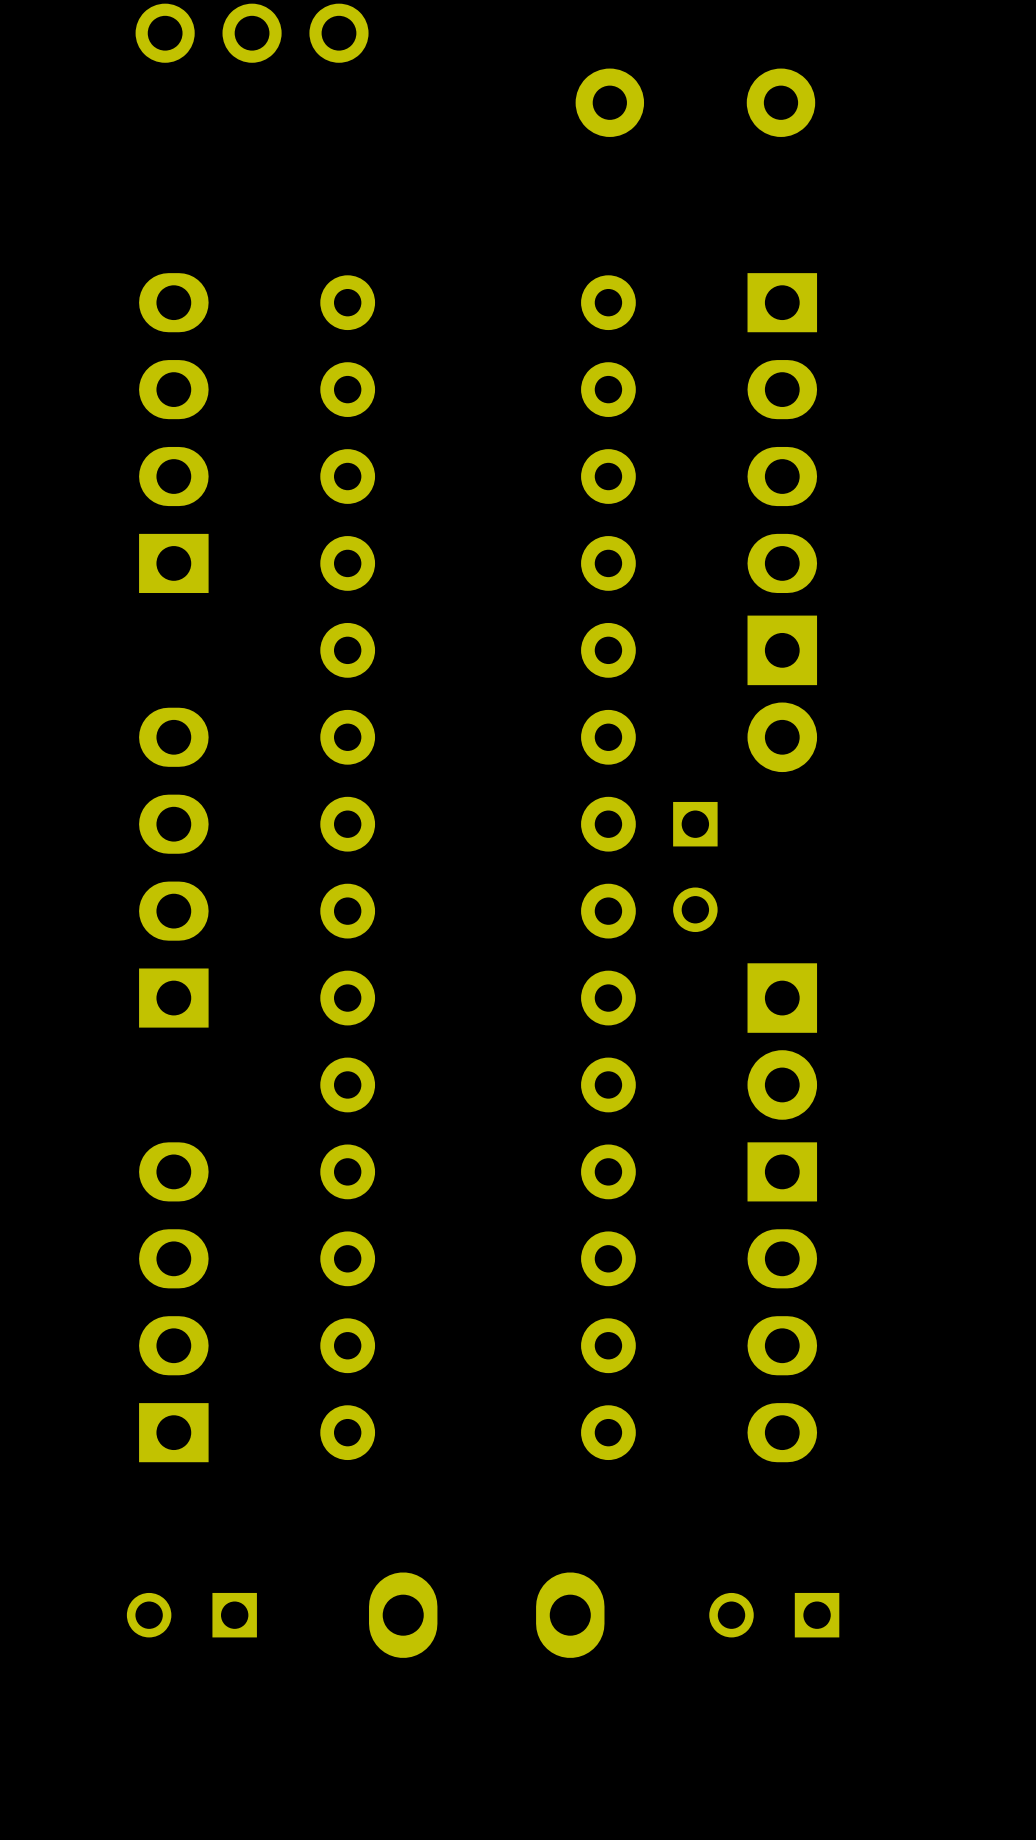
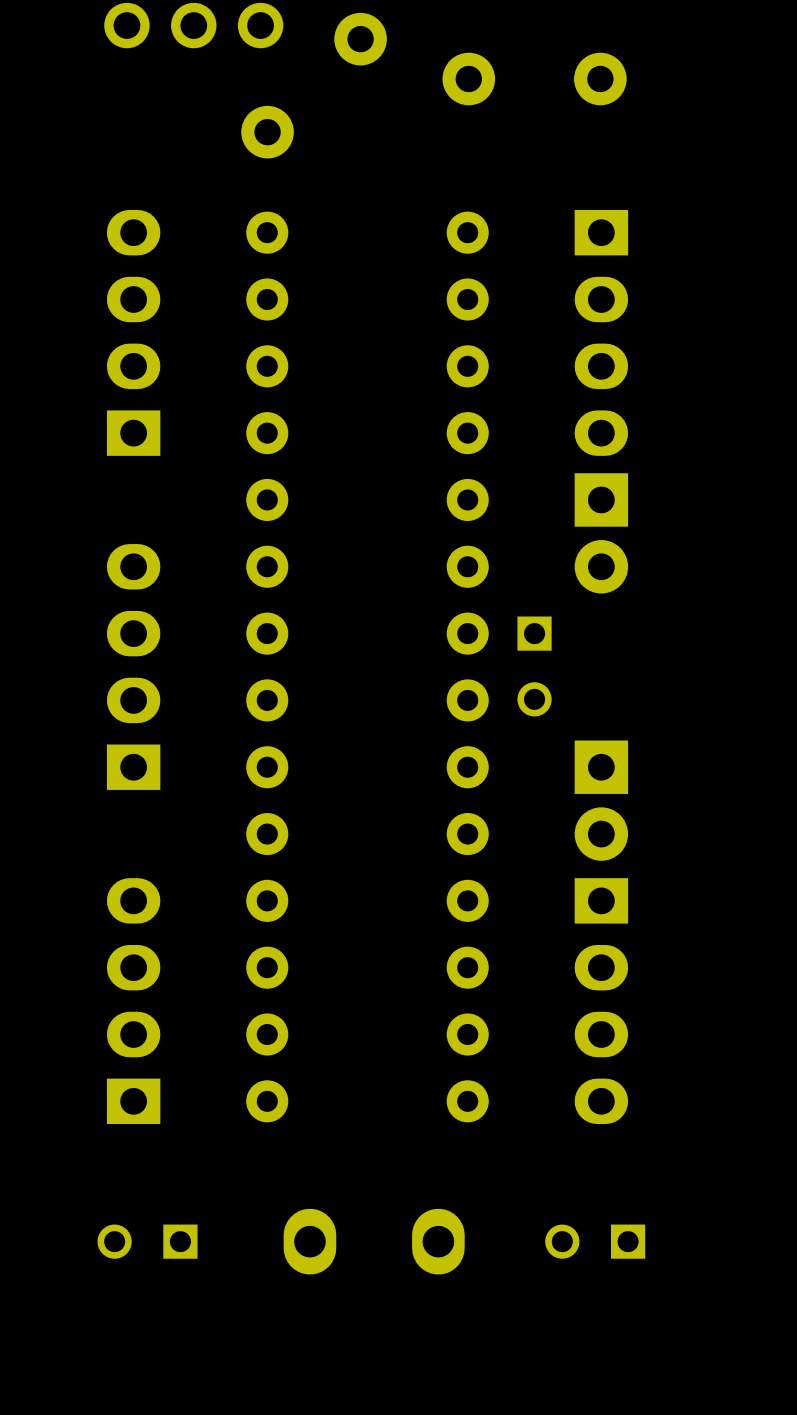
part: none -> (314, 85)

